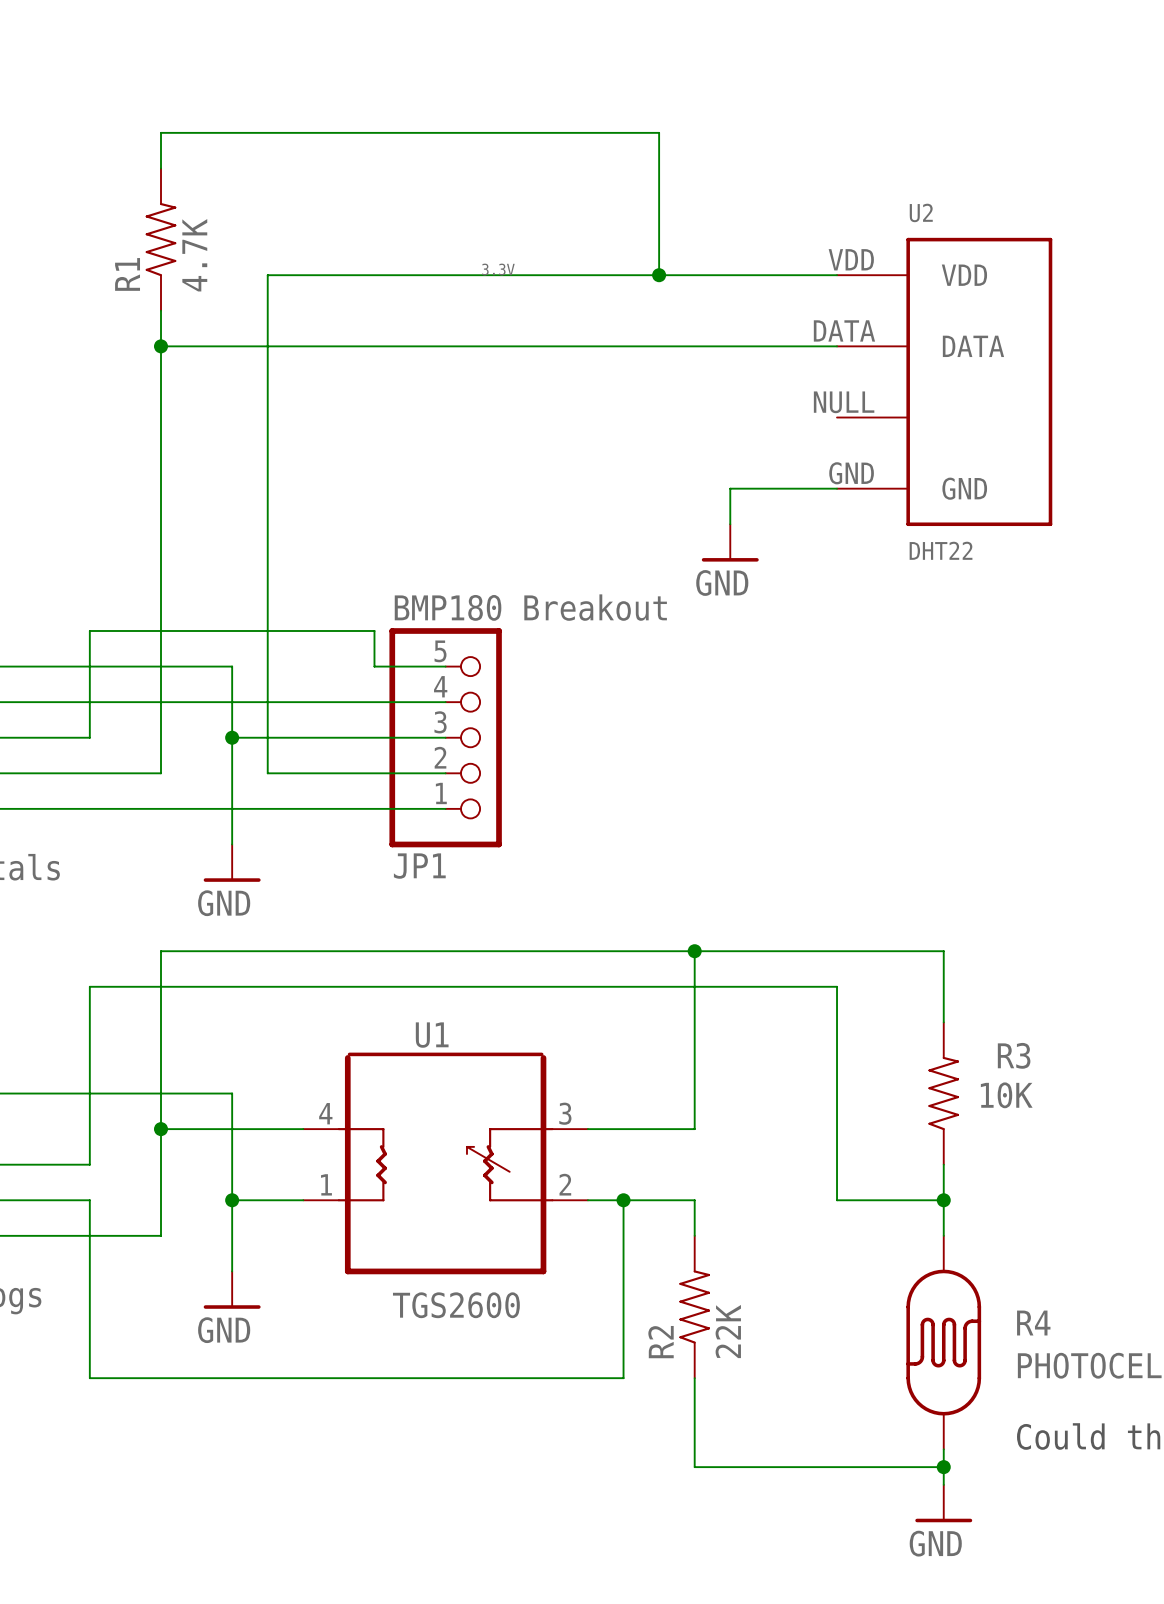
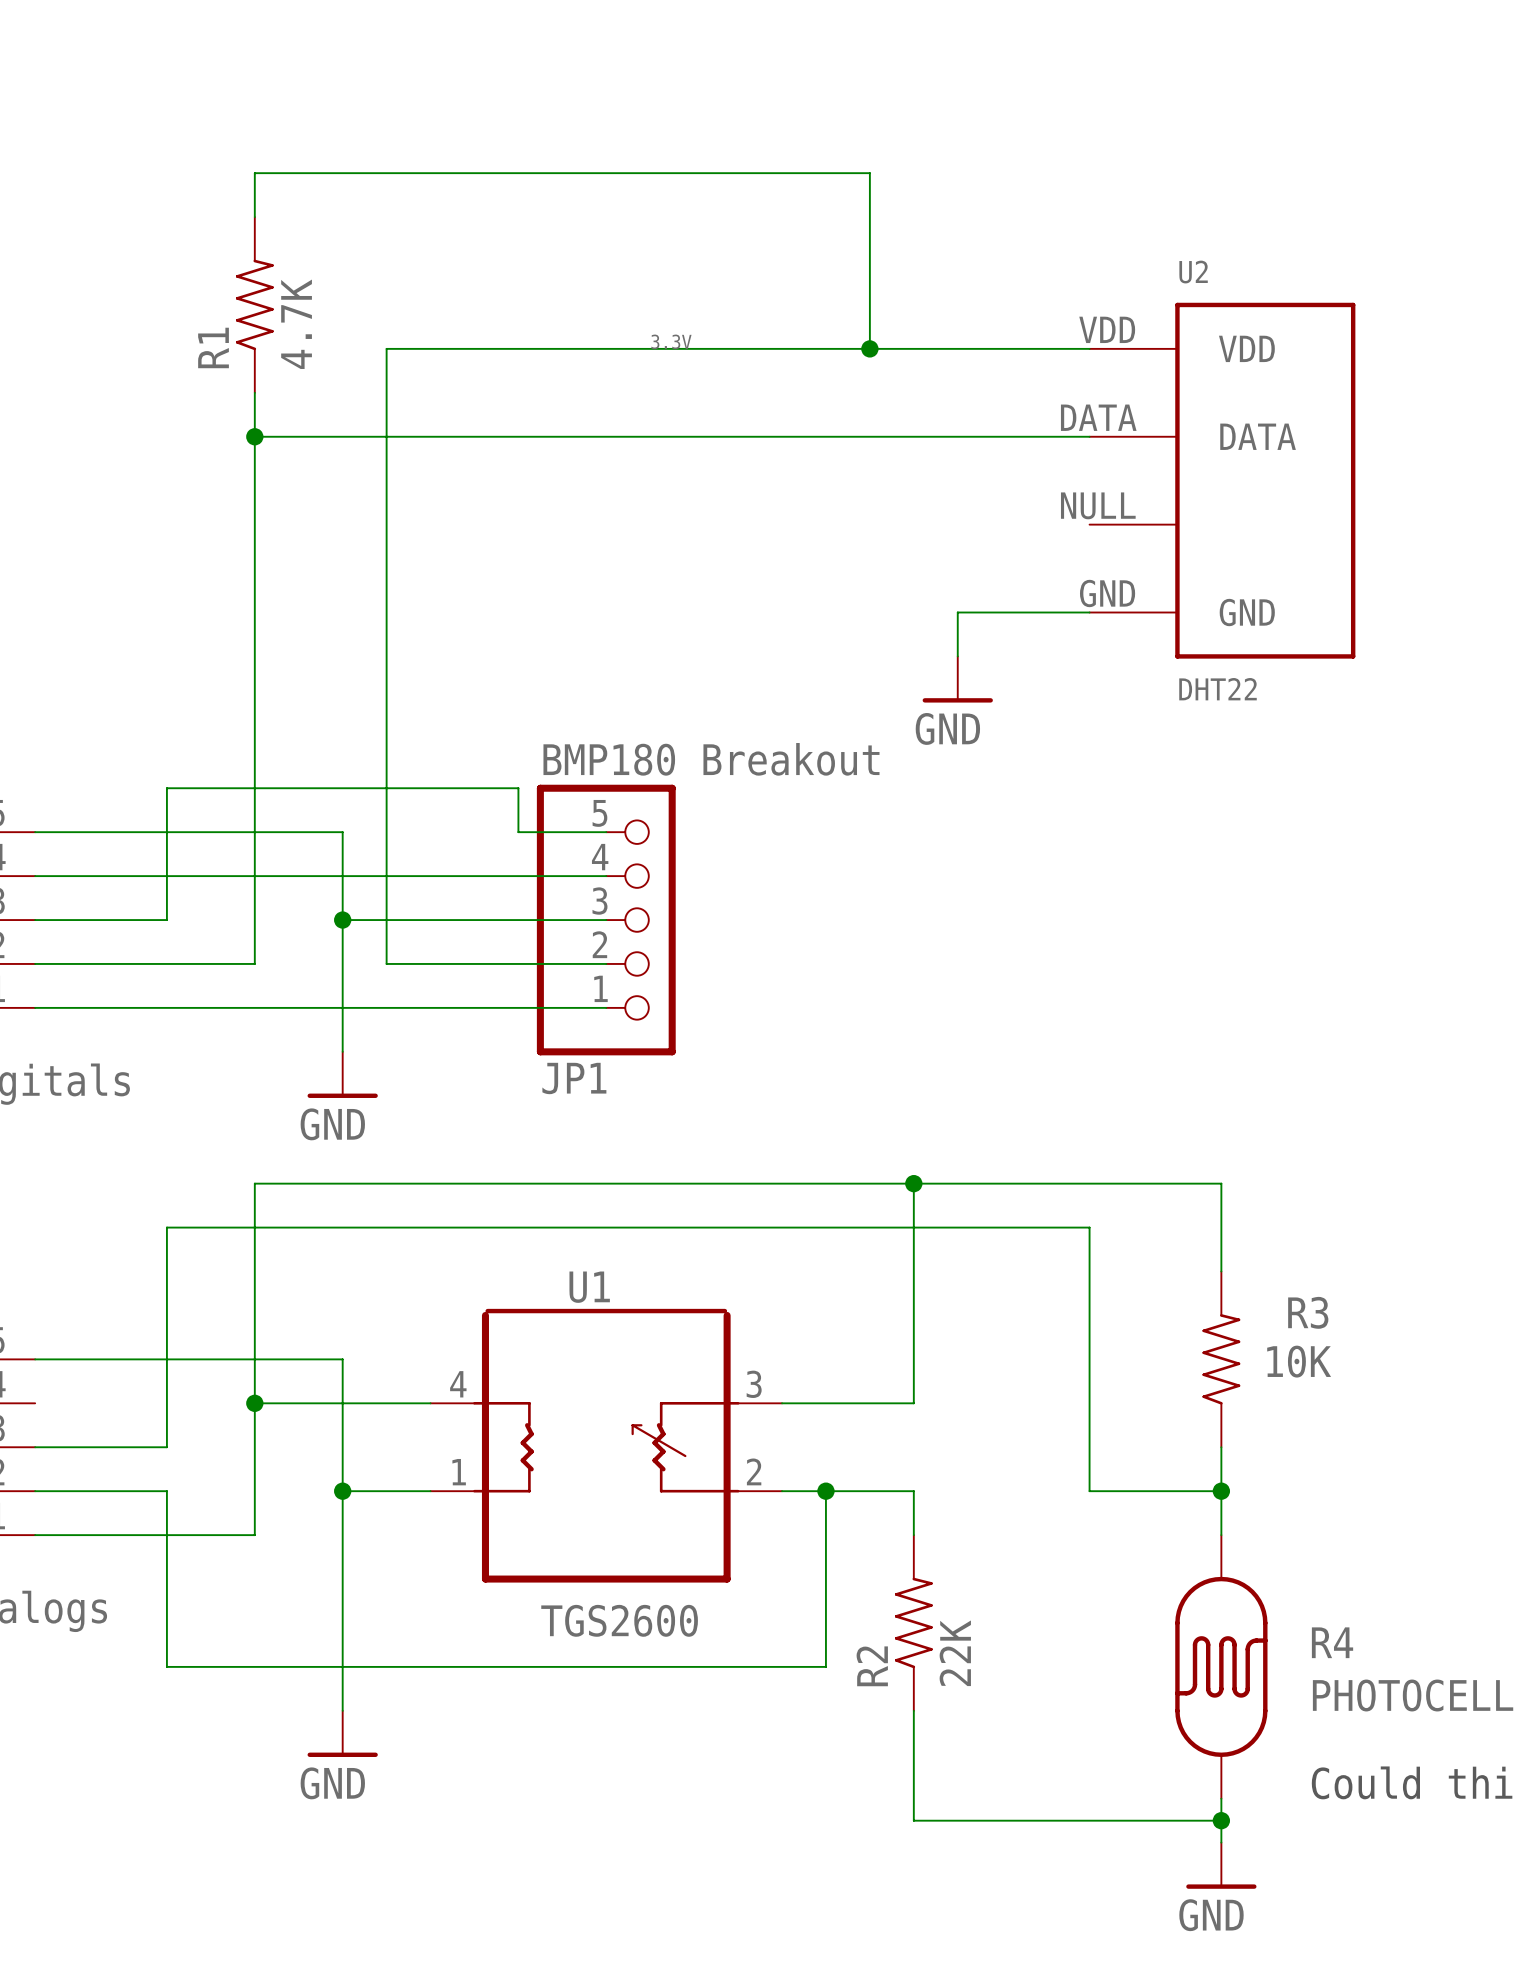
wire: none -> (342, 1579) (342, 1710)
power symbol position: GND (232, 1290) -> GND (342, 1733)
wire: (89, 1342) (89, 1378) (623, 1378) (623, 1342) -> (166, 1666) (825, 1666)

